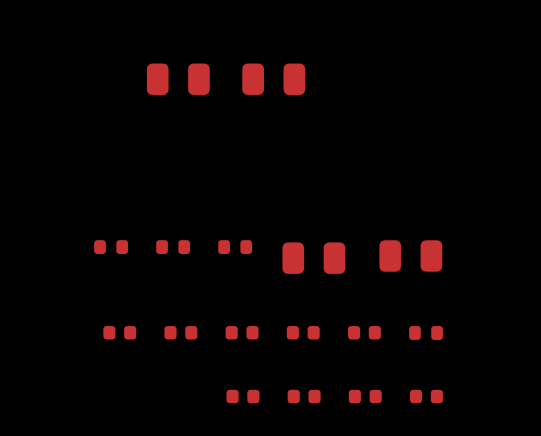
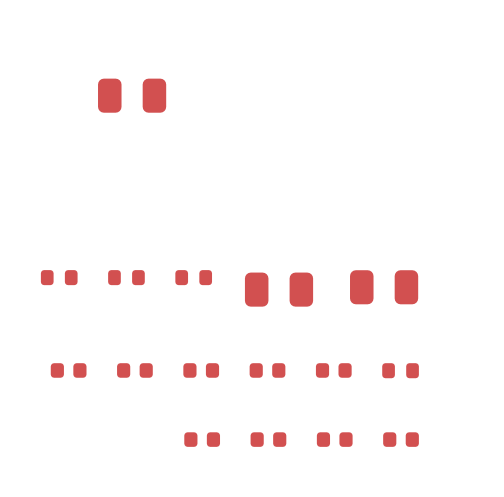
part: (273, 79) -> none

